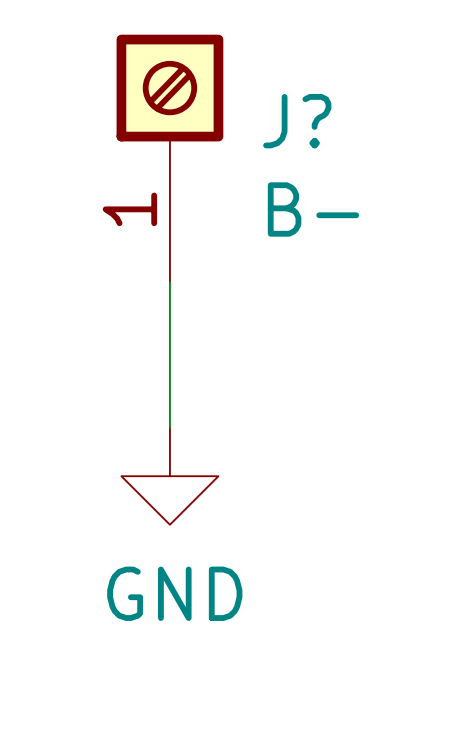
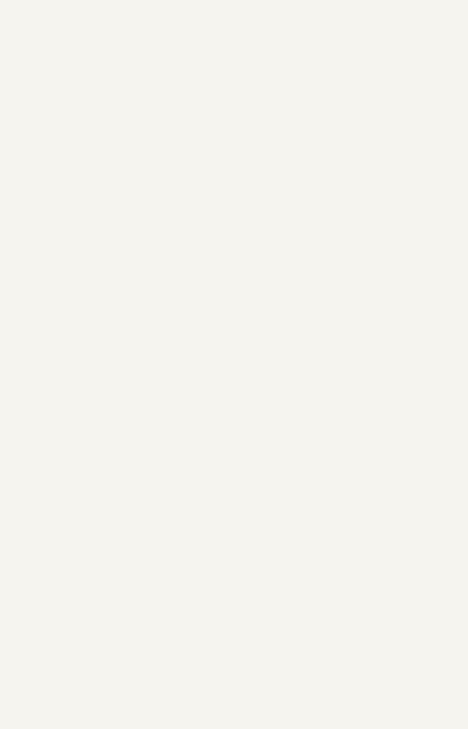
J?: B- (169, 158) -> none
wire: (169, 282) (169, 427) -> none
power symbol: GND (169, 476) -> none

